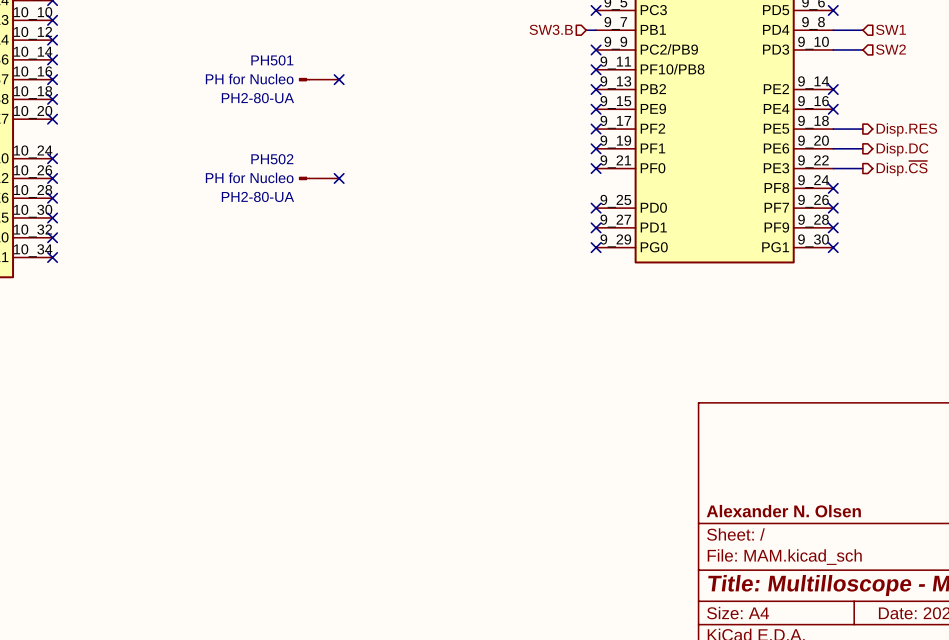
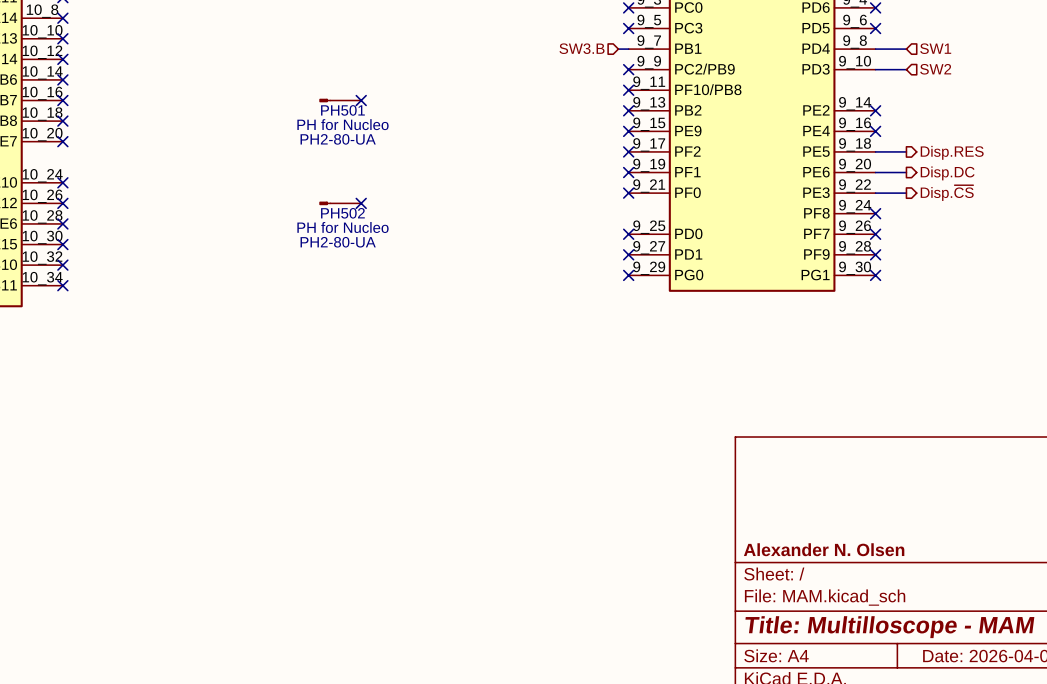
PH501 name position: PH501 (272, 60) -> PH501 (342, 110)
PH501 value position: PH for Nucleo (249, 79) -> PH for Nucleo (342, 124)
PH501 text position: PH2-80-UA (257, 98) -> PH2-80-UA (338, 139)
PH502 name position: PH502 (272, 159) -> PH502 (342, 213)
PH502 value position: PH for Nucleo (249, 177) -> PH for Nucleo (342, 227)
PH502 text position: PH2-80-UA (257, 196) -> PH2-80-UA (338, 242)

